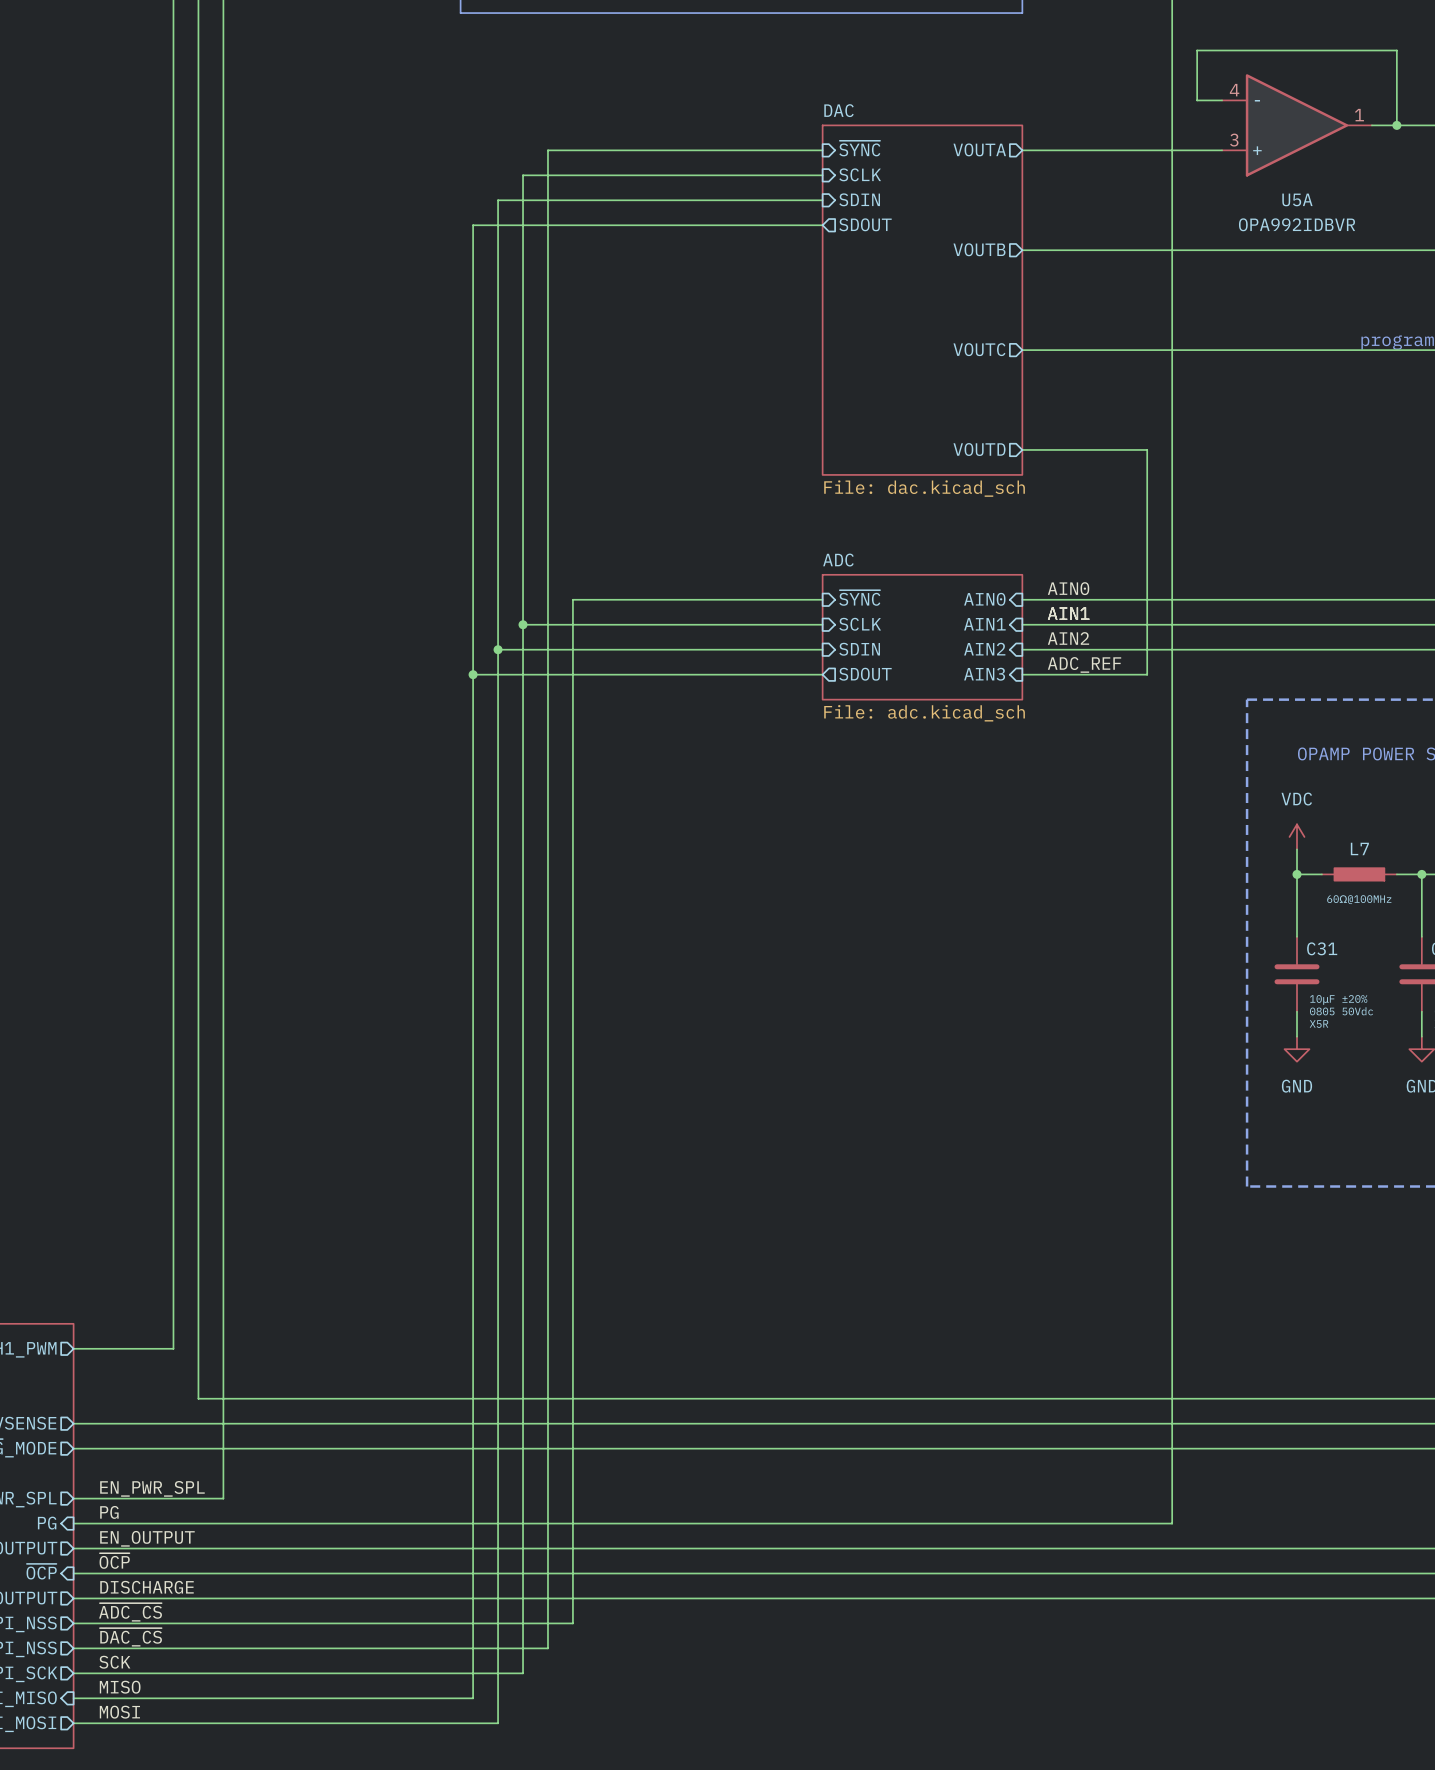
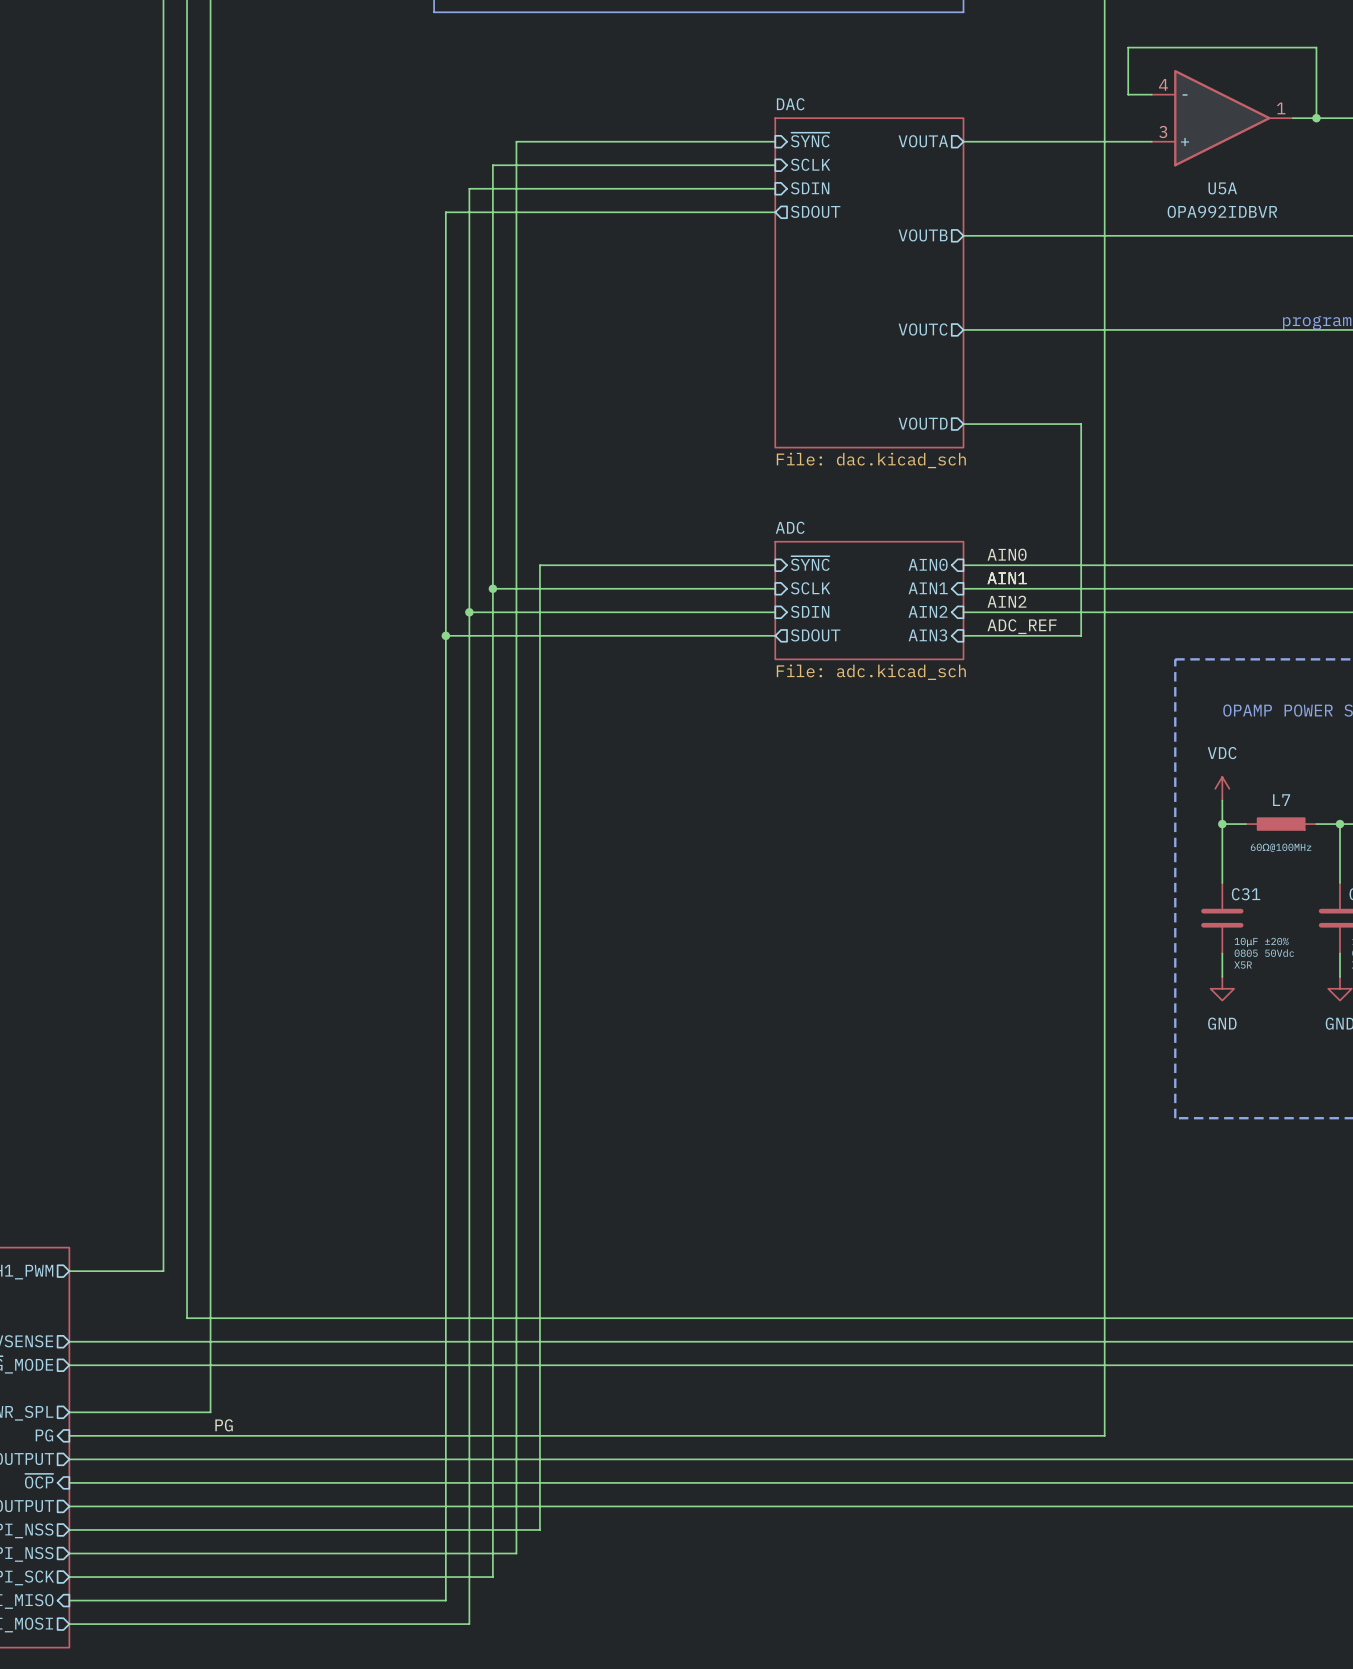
label: EN_PWR_SPL (152, 1488) -> none
label position: PG (109, 1512) -> PG (224, 1425)
label: EN_OUTPUT (147, 1538) -> none
label: ~{OCP} (114, 1561) -> none
label: DISCHARGE (147, 1587) -> none
label: ~{ADC_CS} (130, 1612) -> none
label: ~{DAC_CS} (130, 1637) -> none
label: SCK (114, 1662) -> none
label: MISO (120, 1687) -> none
label: MOSI (119, 1712) -> none

